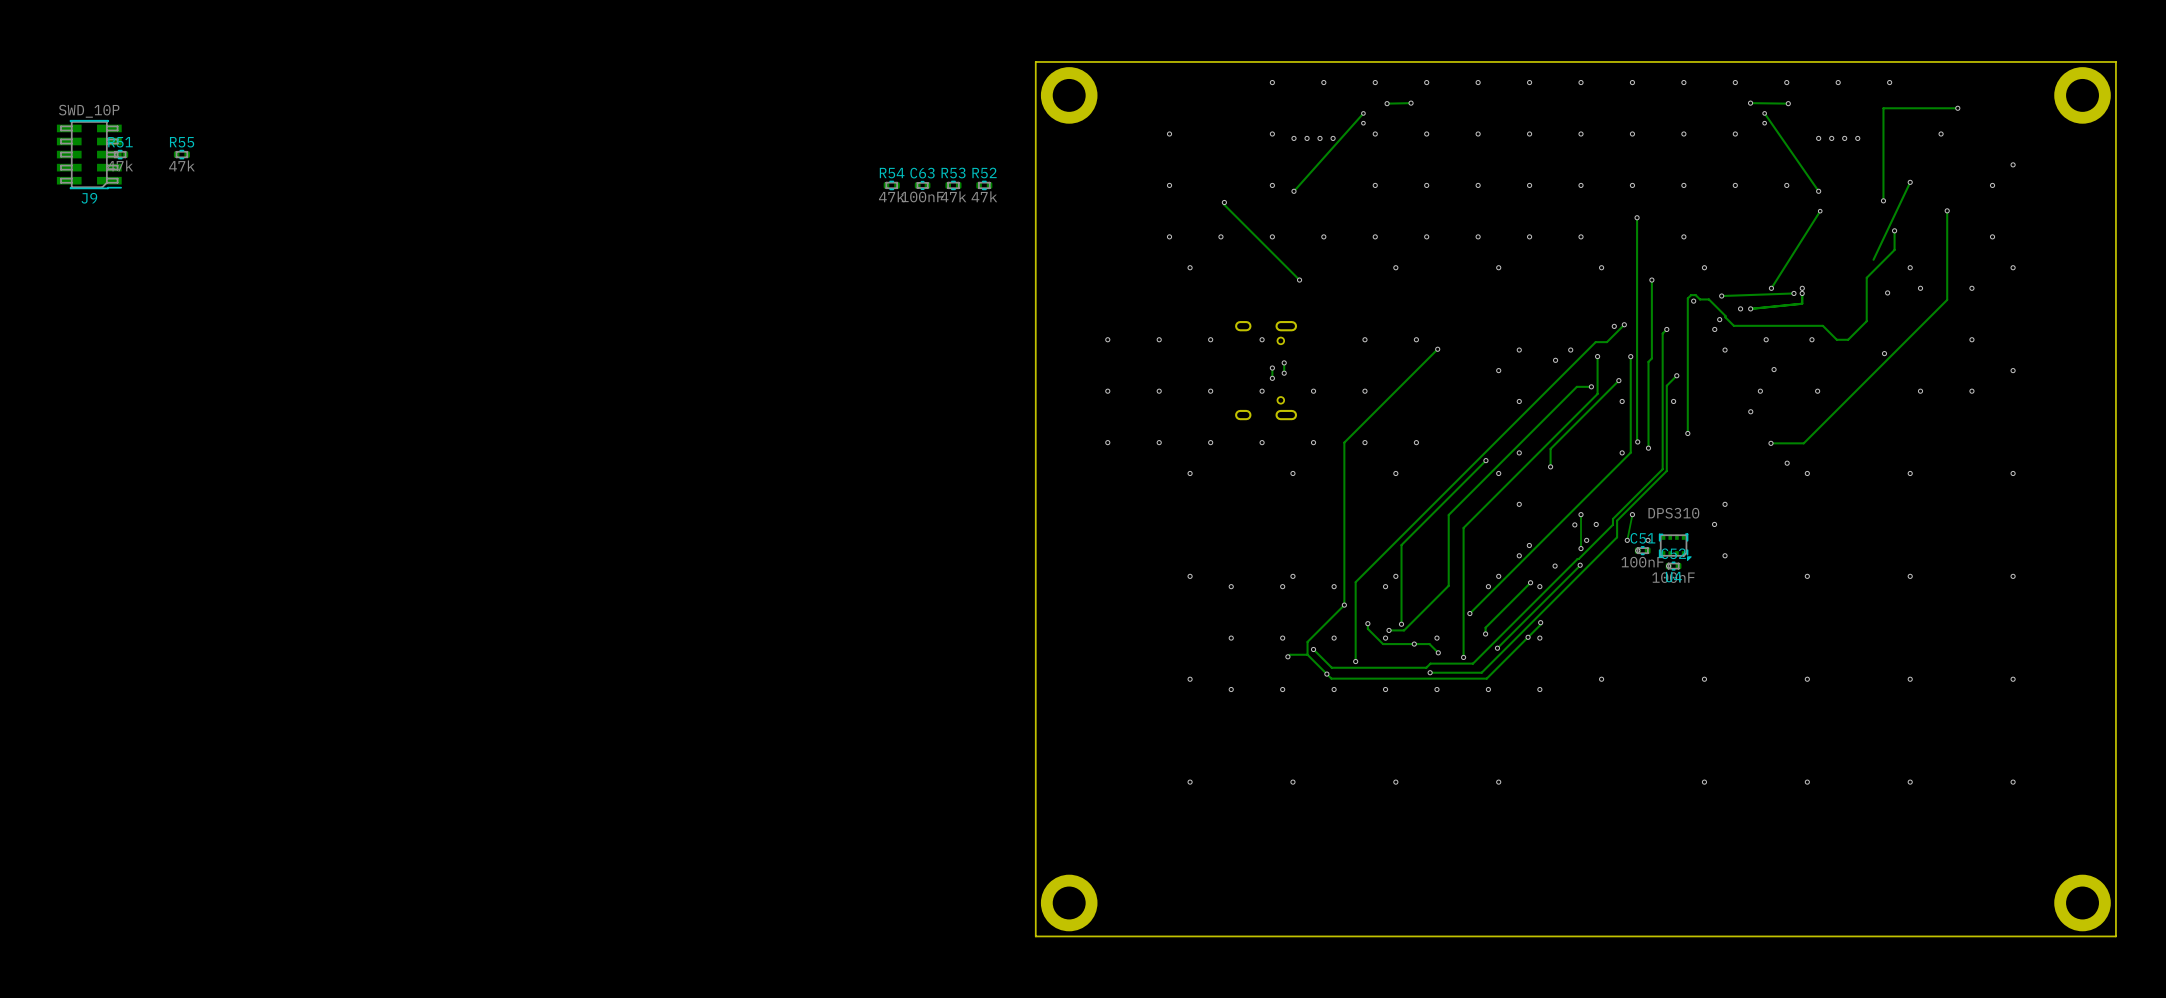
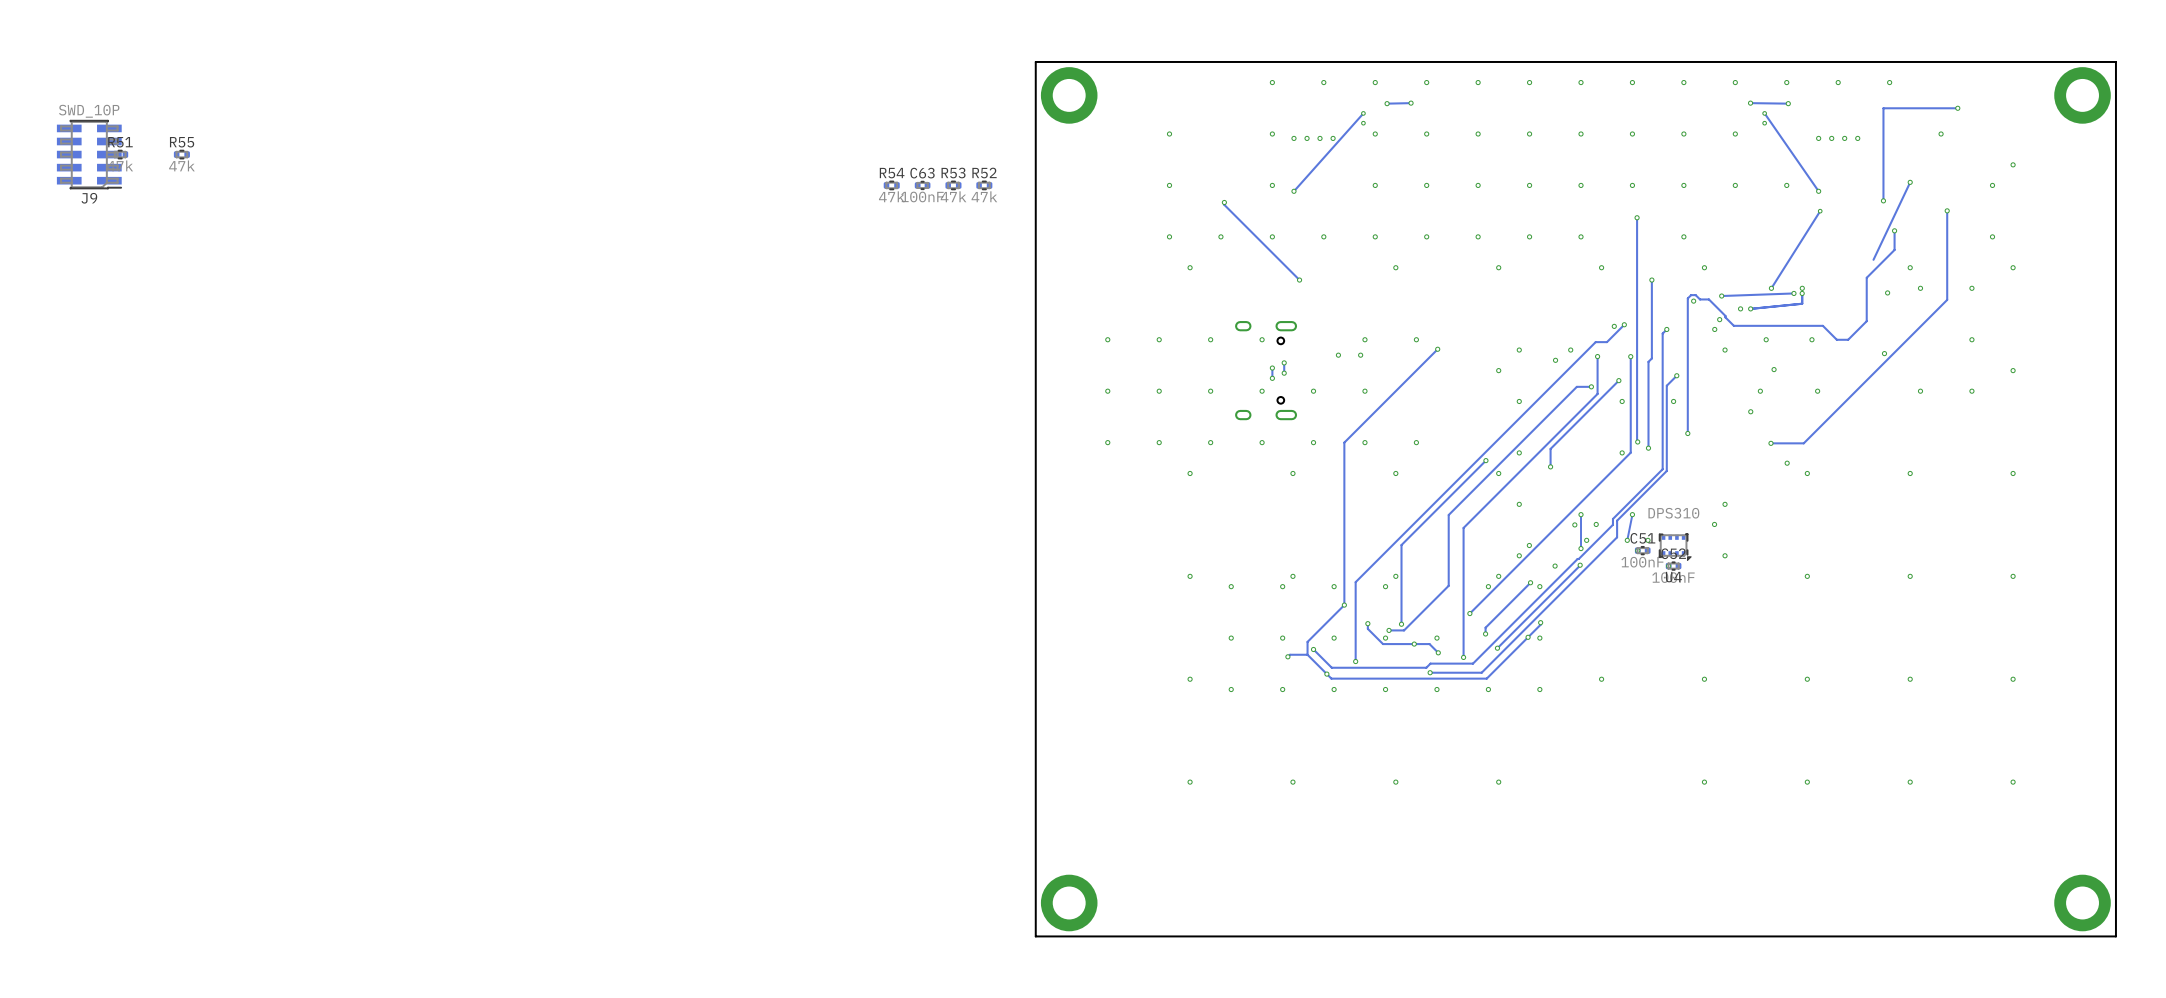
via: none -> (1338, 355)
via: none -> (1360, 355)

